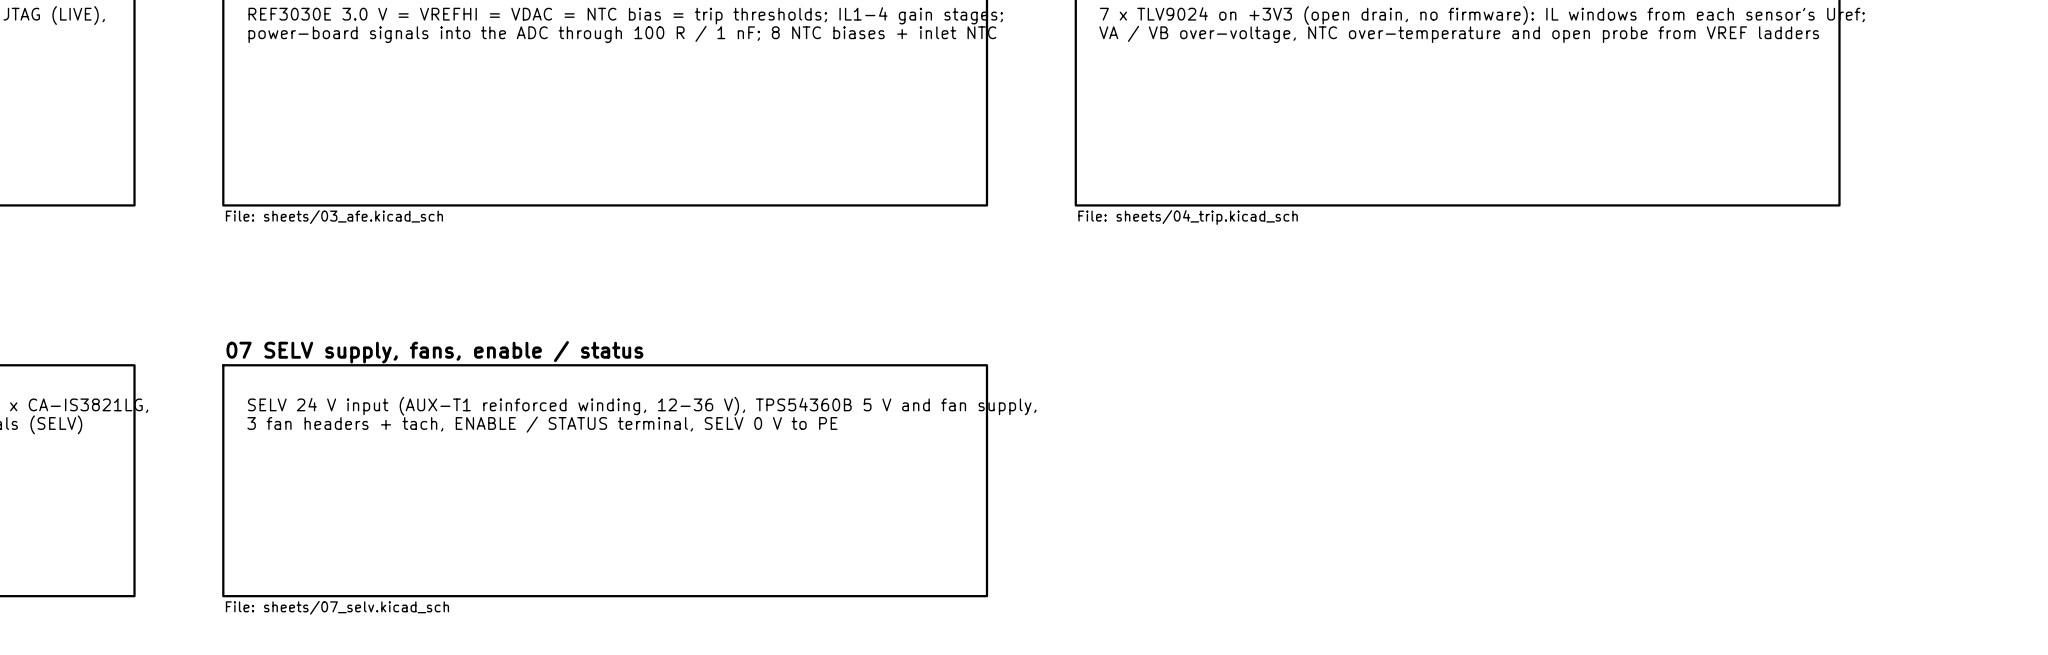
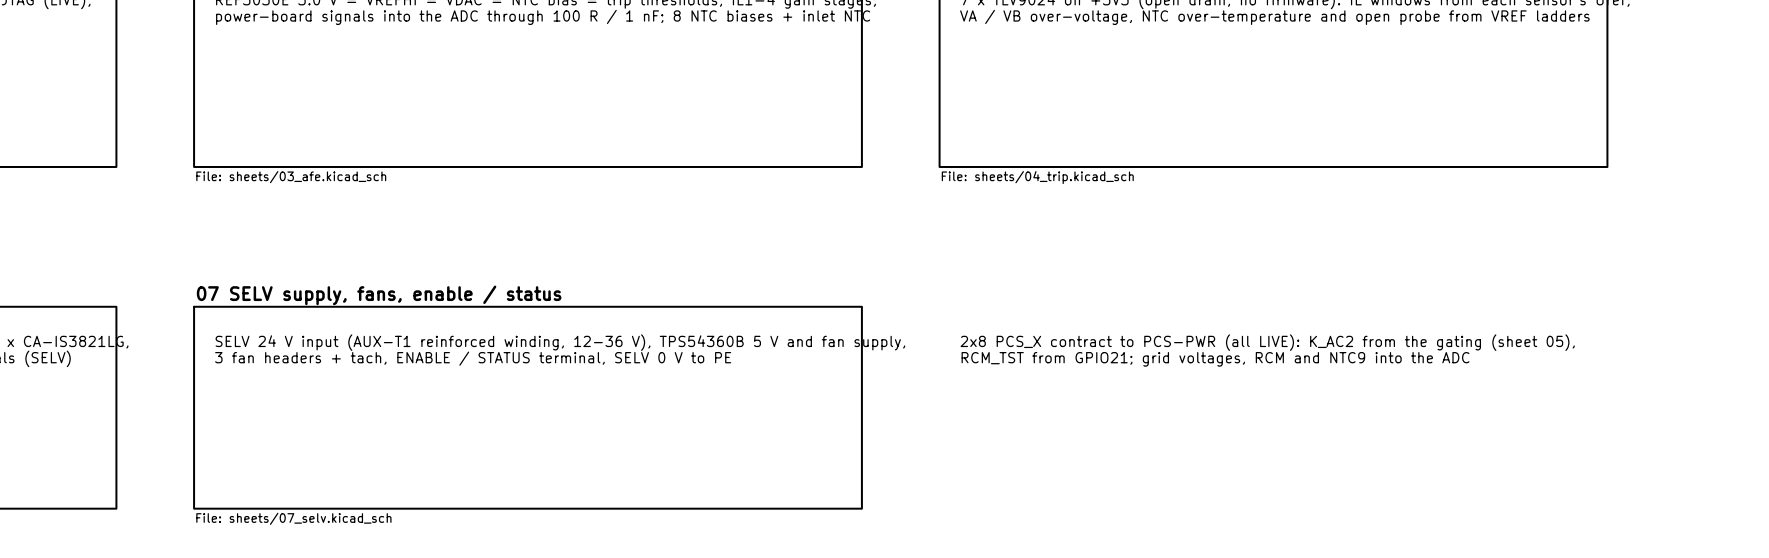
text: none -> 2x8 PCS_X contract to PCS-PWR (all LIVE): K_AC2 from the gating (sheet 05), (1267, 342)
text: none -> RCM_TST from GPIO21; grid voltages, RCM and NTC9 into the ADC (1215, 359)

